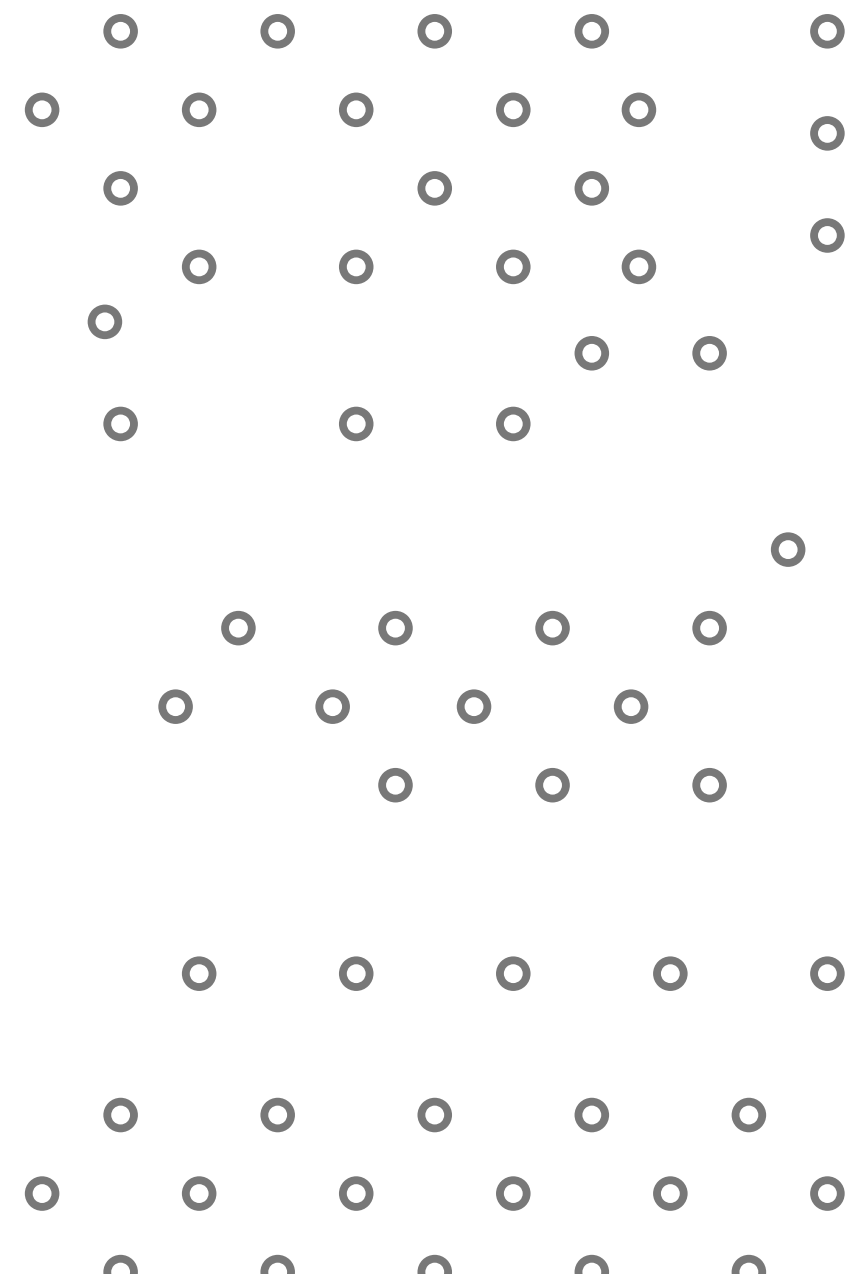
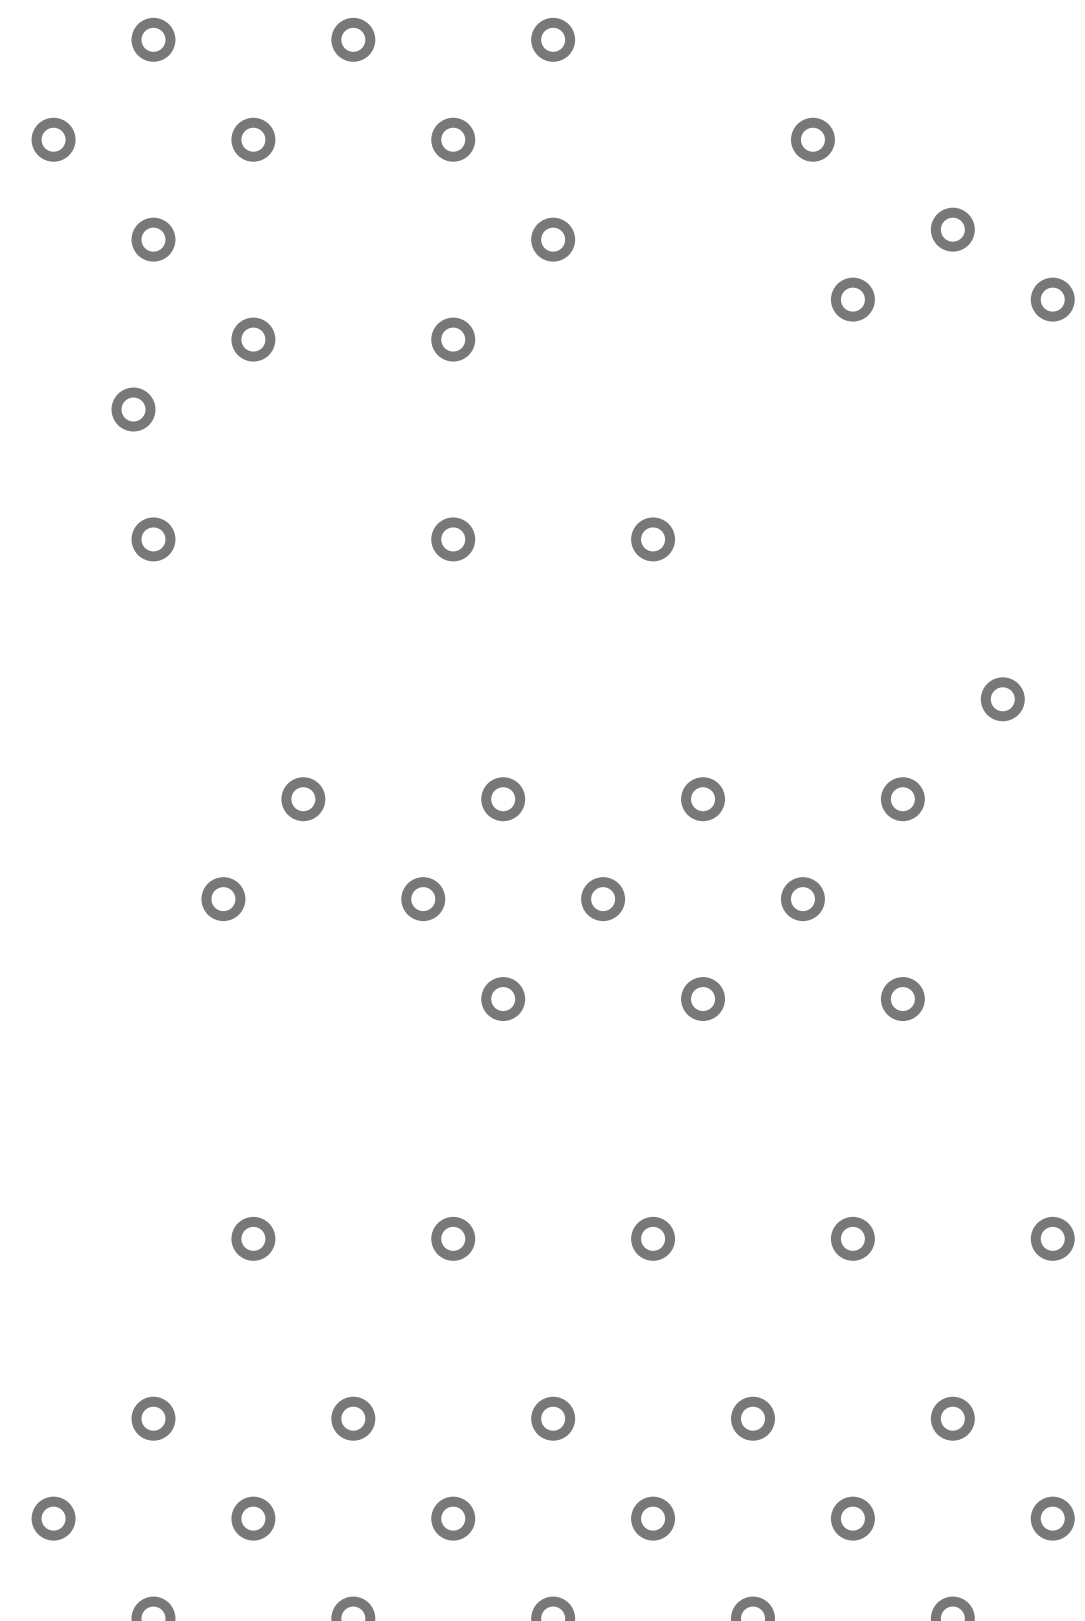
via: (591, 31) -> none
via: (827, 31) -> none
via: (513, 109) -> none
via: (827, 133) -> none
via: none -> (952, 229)
via: (591, 188) -> none
via: (513, 266) -> none
via position: (638, 266) -> (852, 299)
via: (591, 353) -> none
via: (709, 353) -> none

